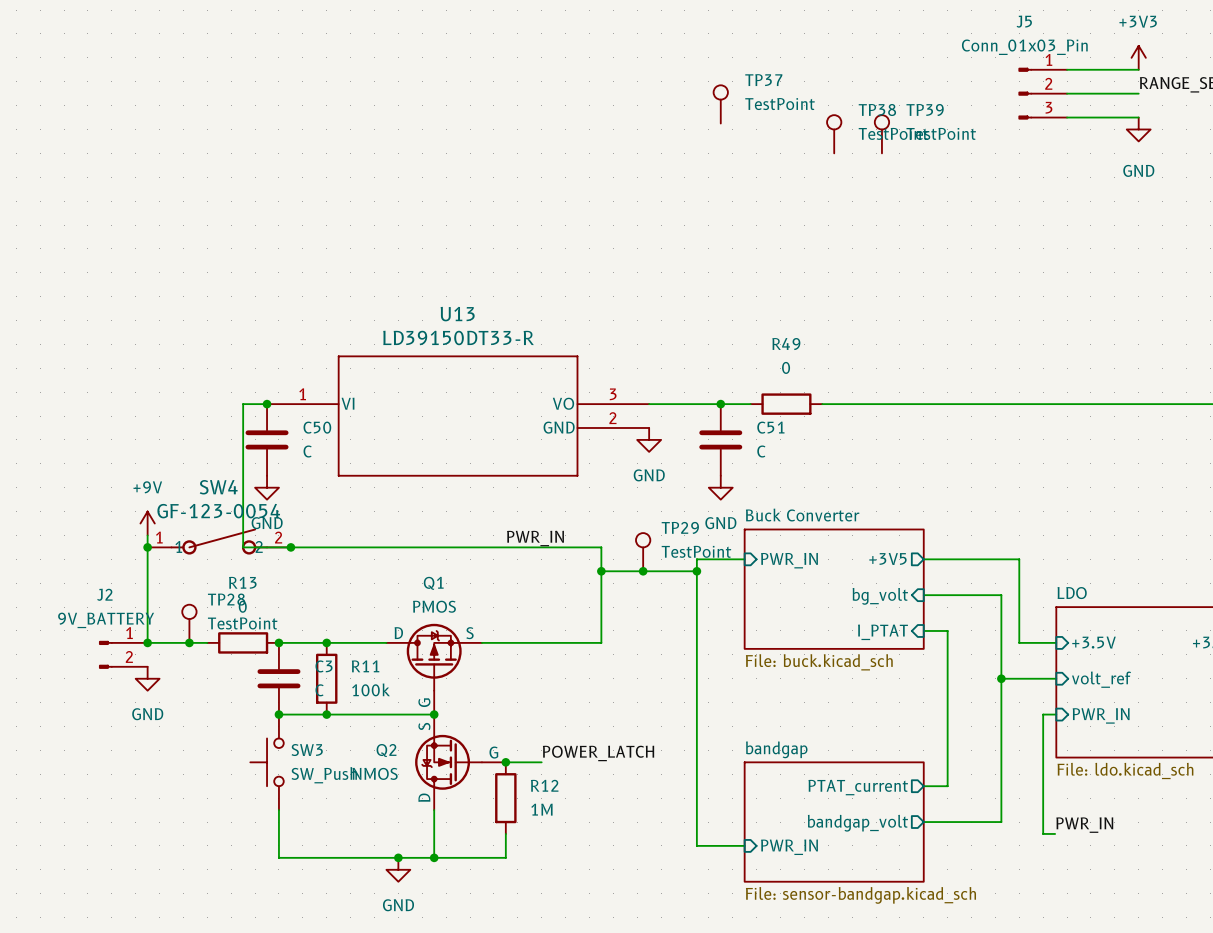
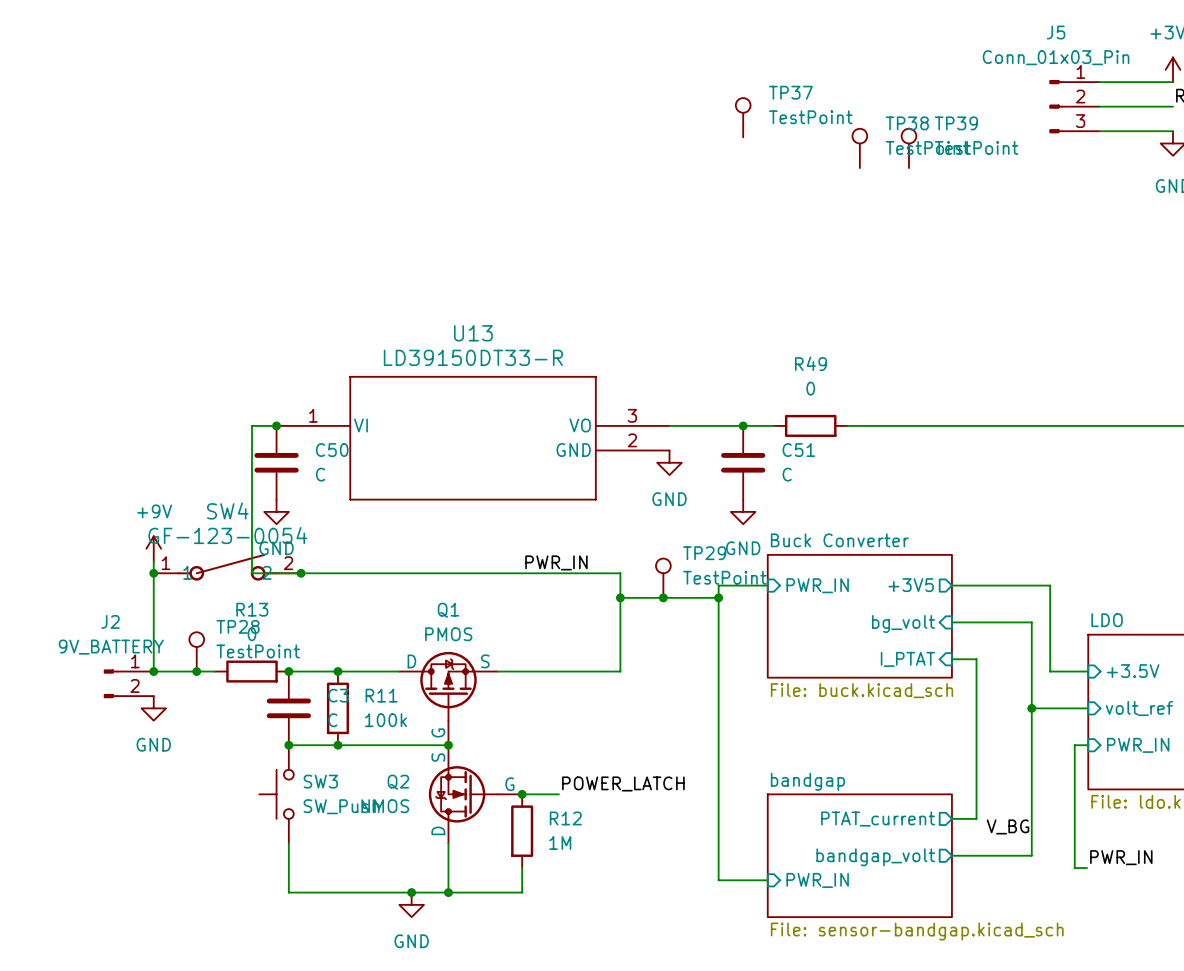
label: none -> V_BG (1008, 826)

